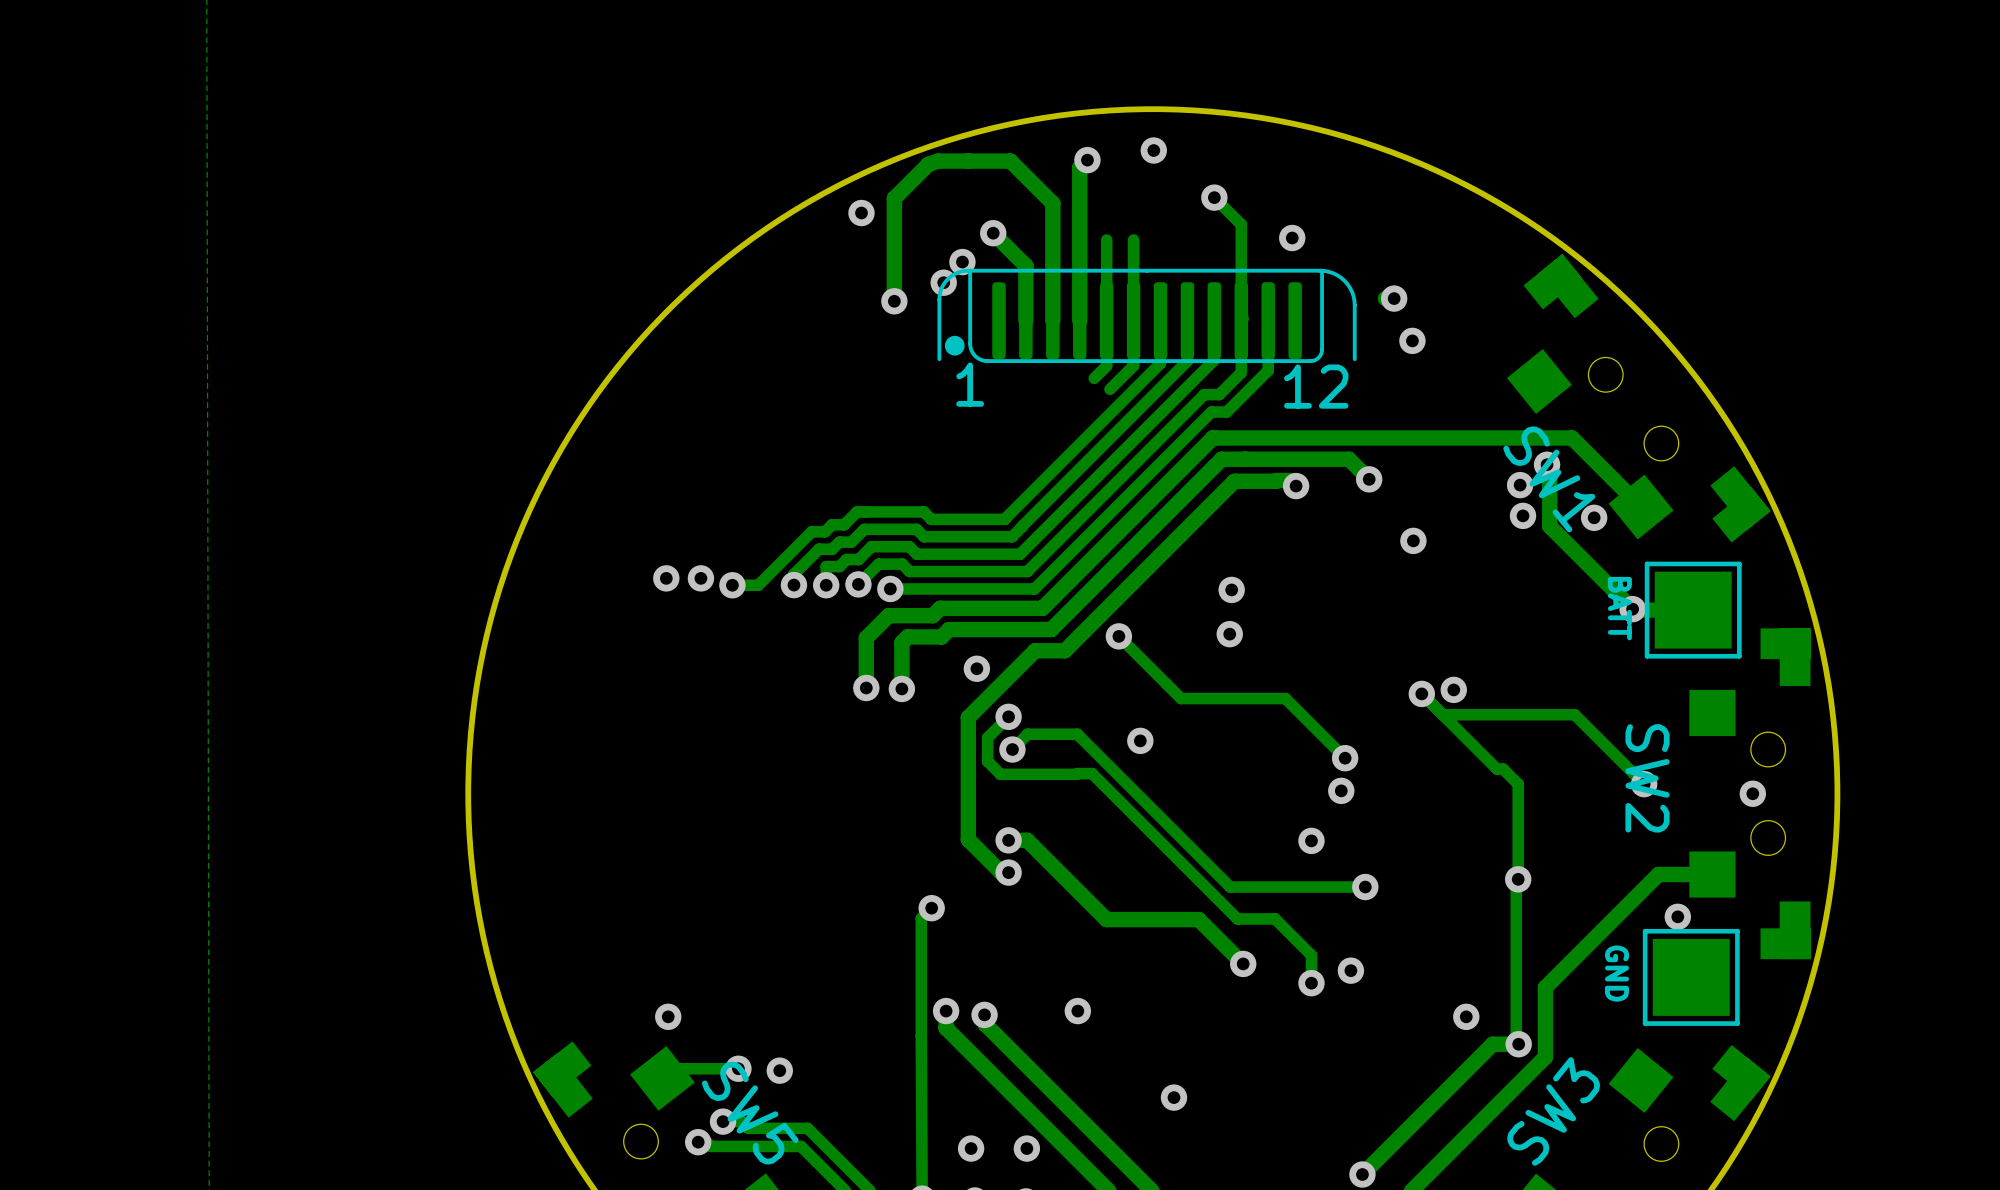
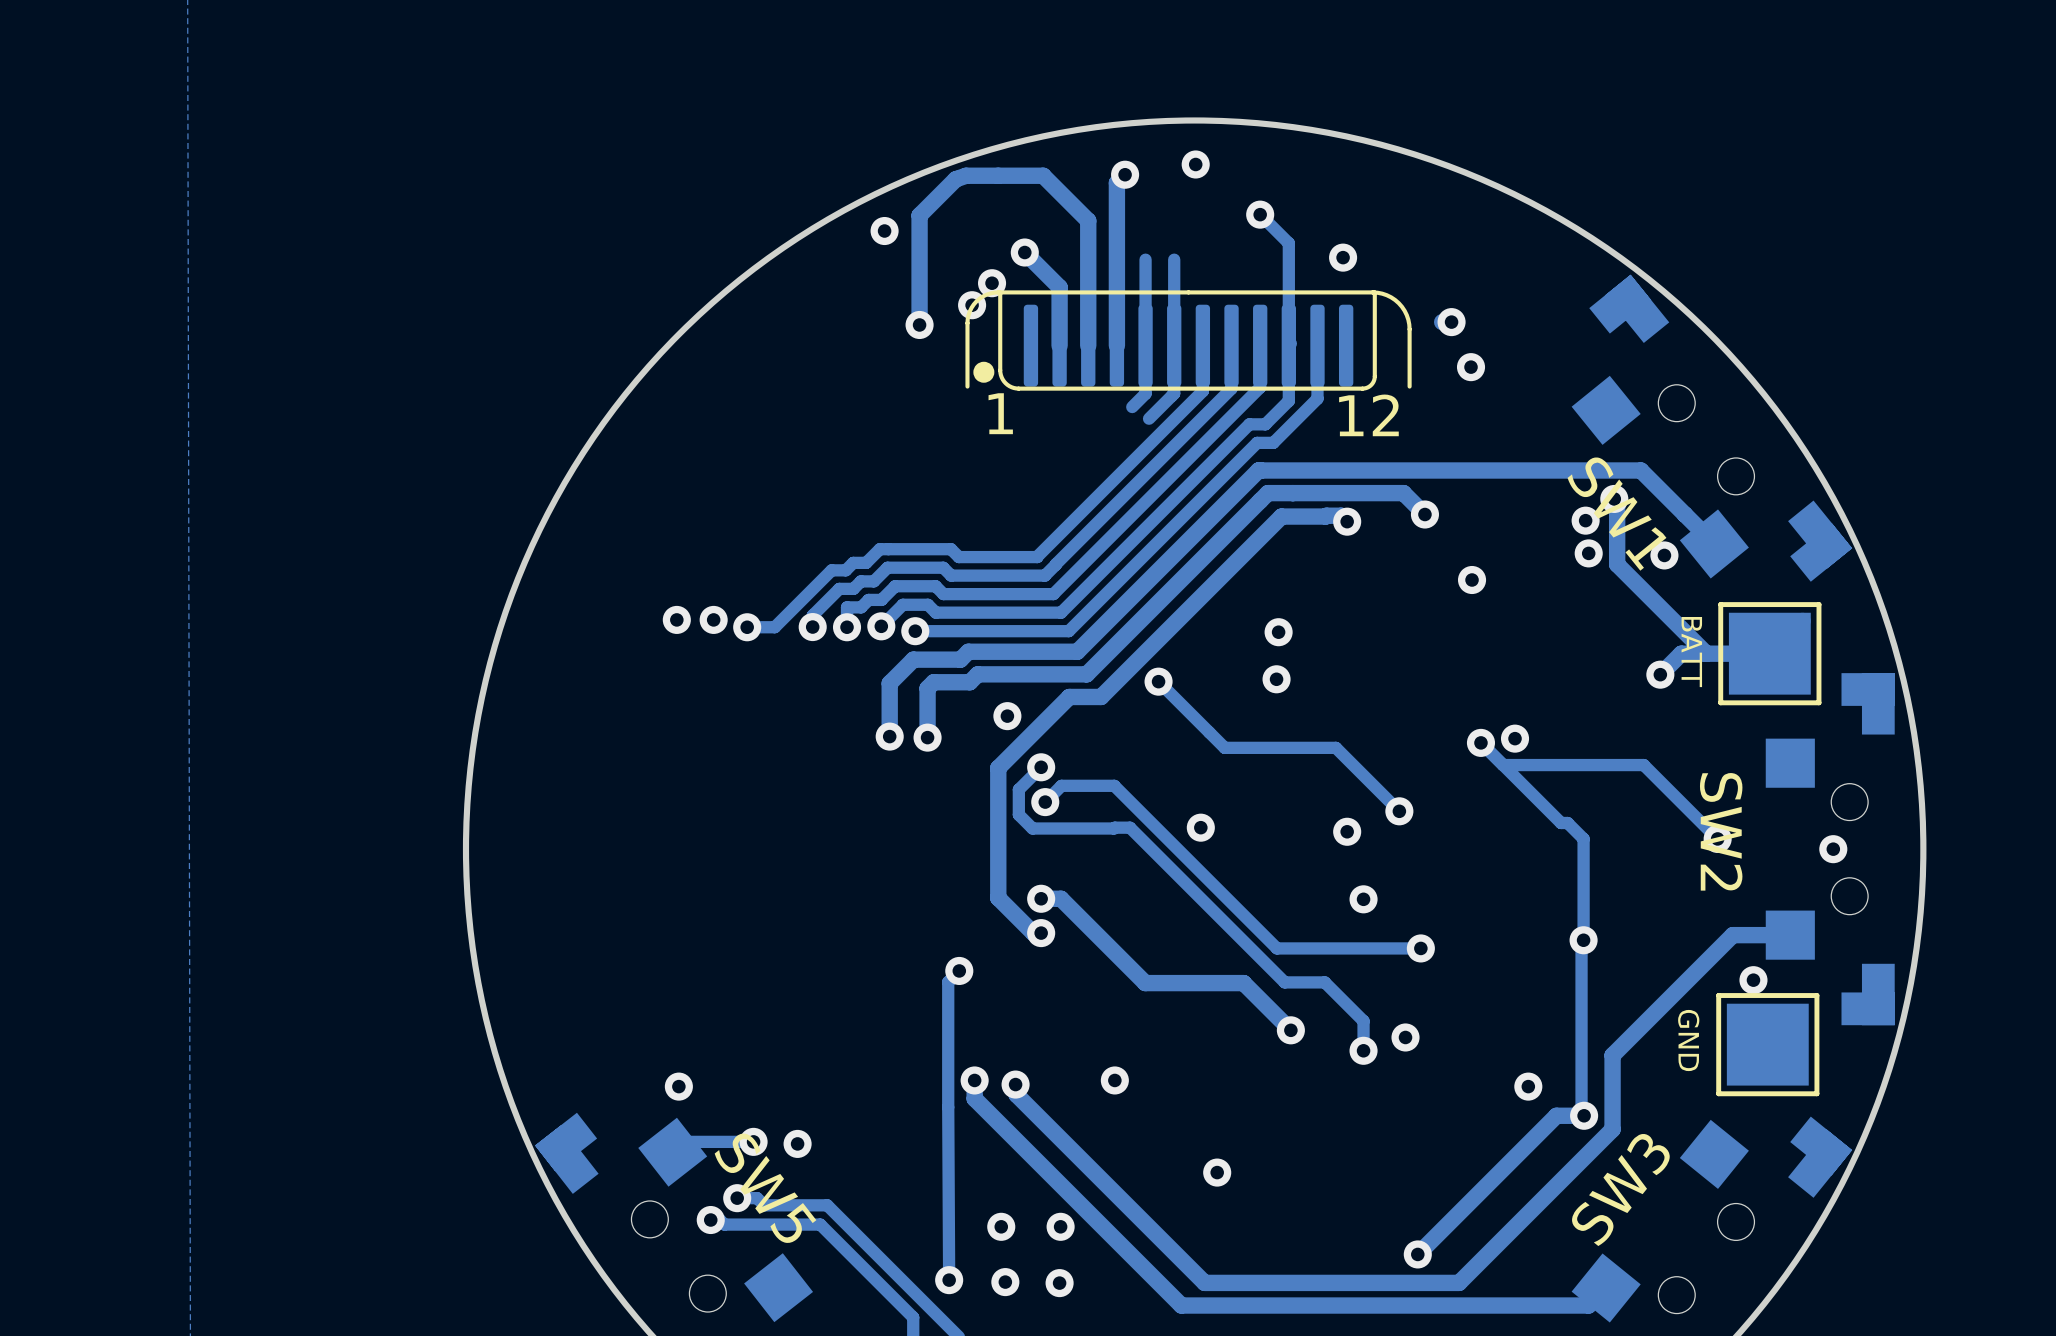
via position: (1632, 609) -> (1660, 674)
track: none -> (1706, 653) (1681, 653) (1660, 674)
via position: (1140, 740) -> (1200, 827)
via position: (1341, 790) -> (1347, 831)

